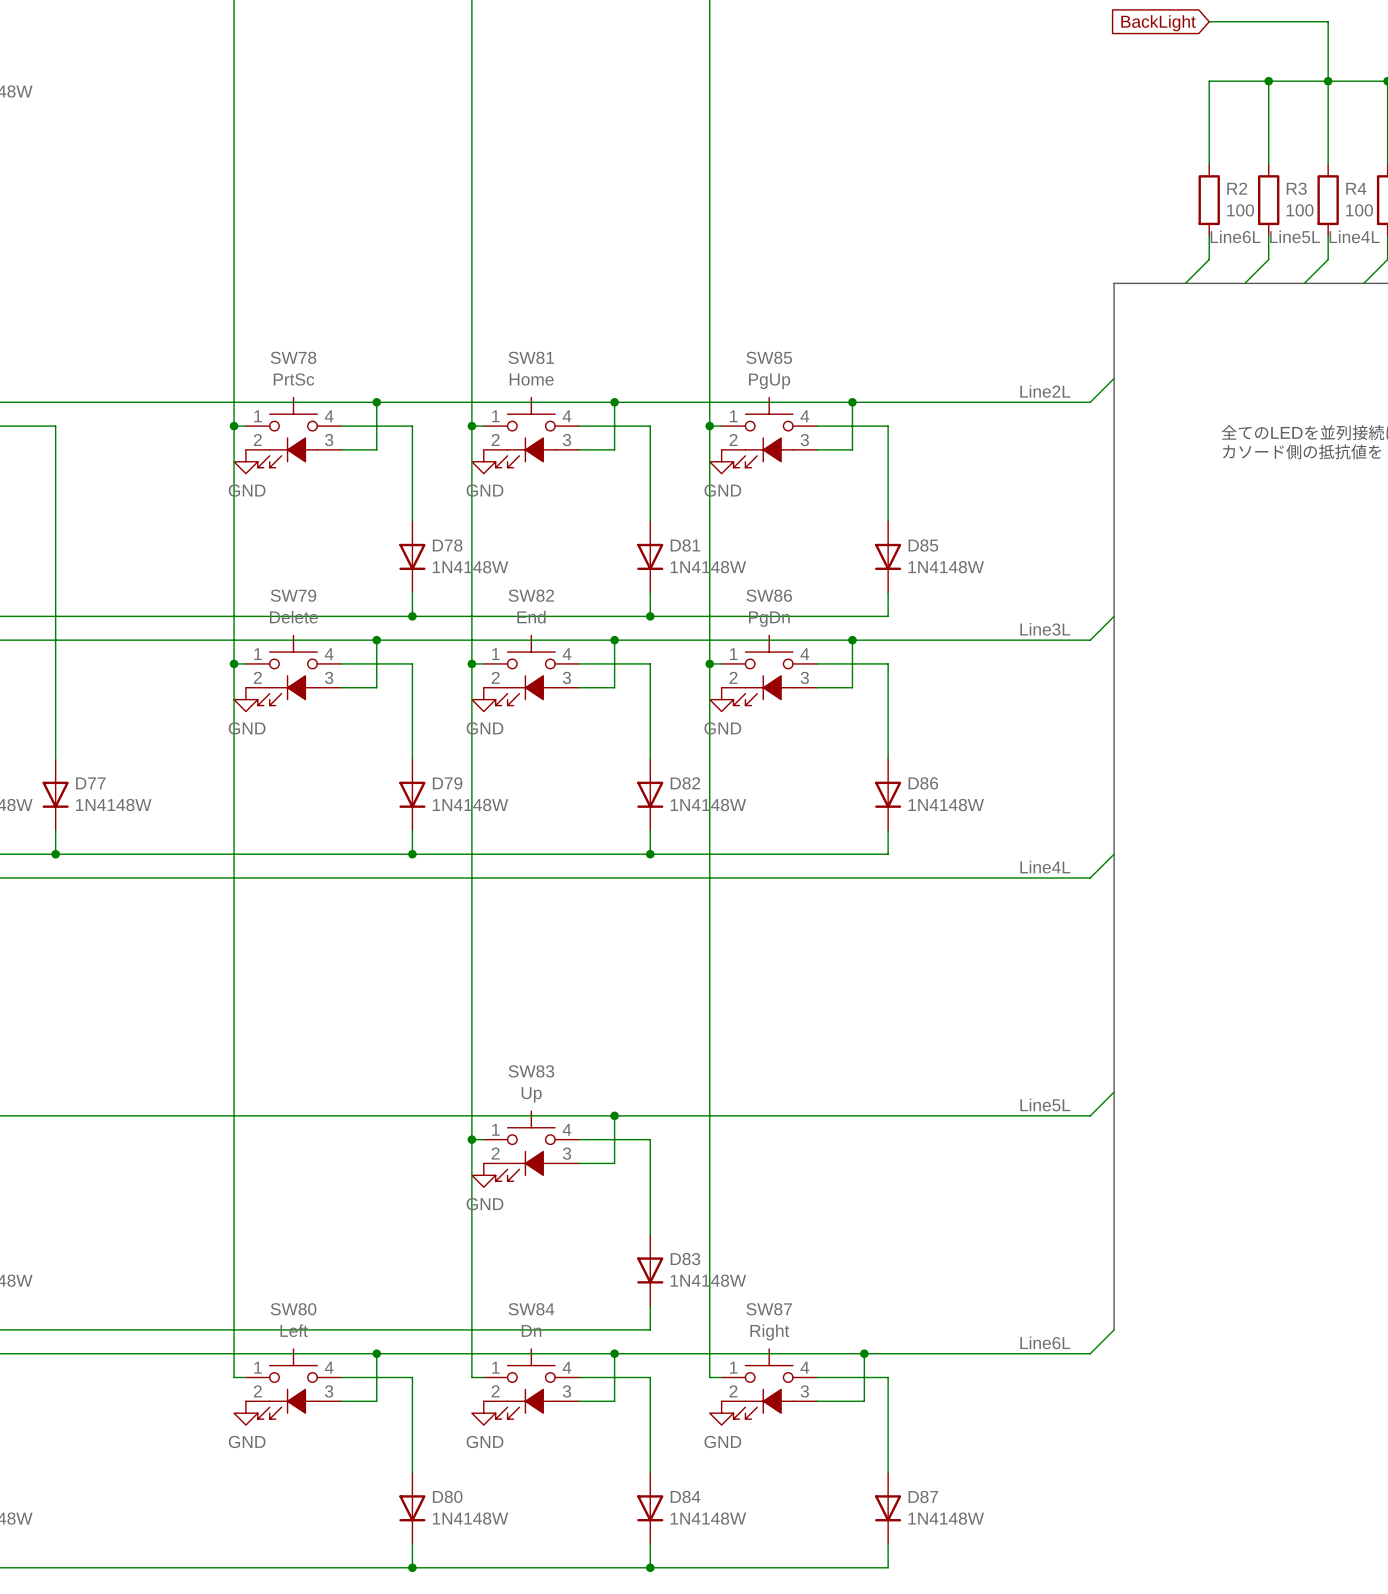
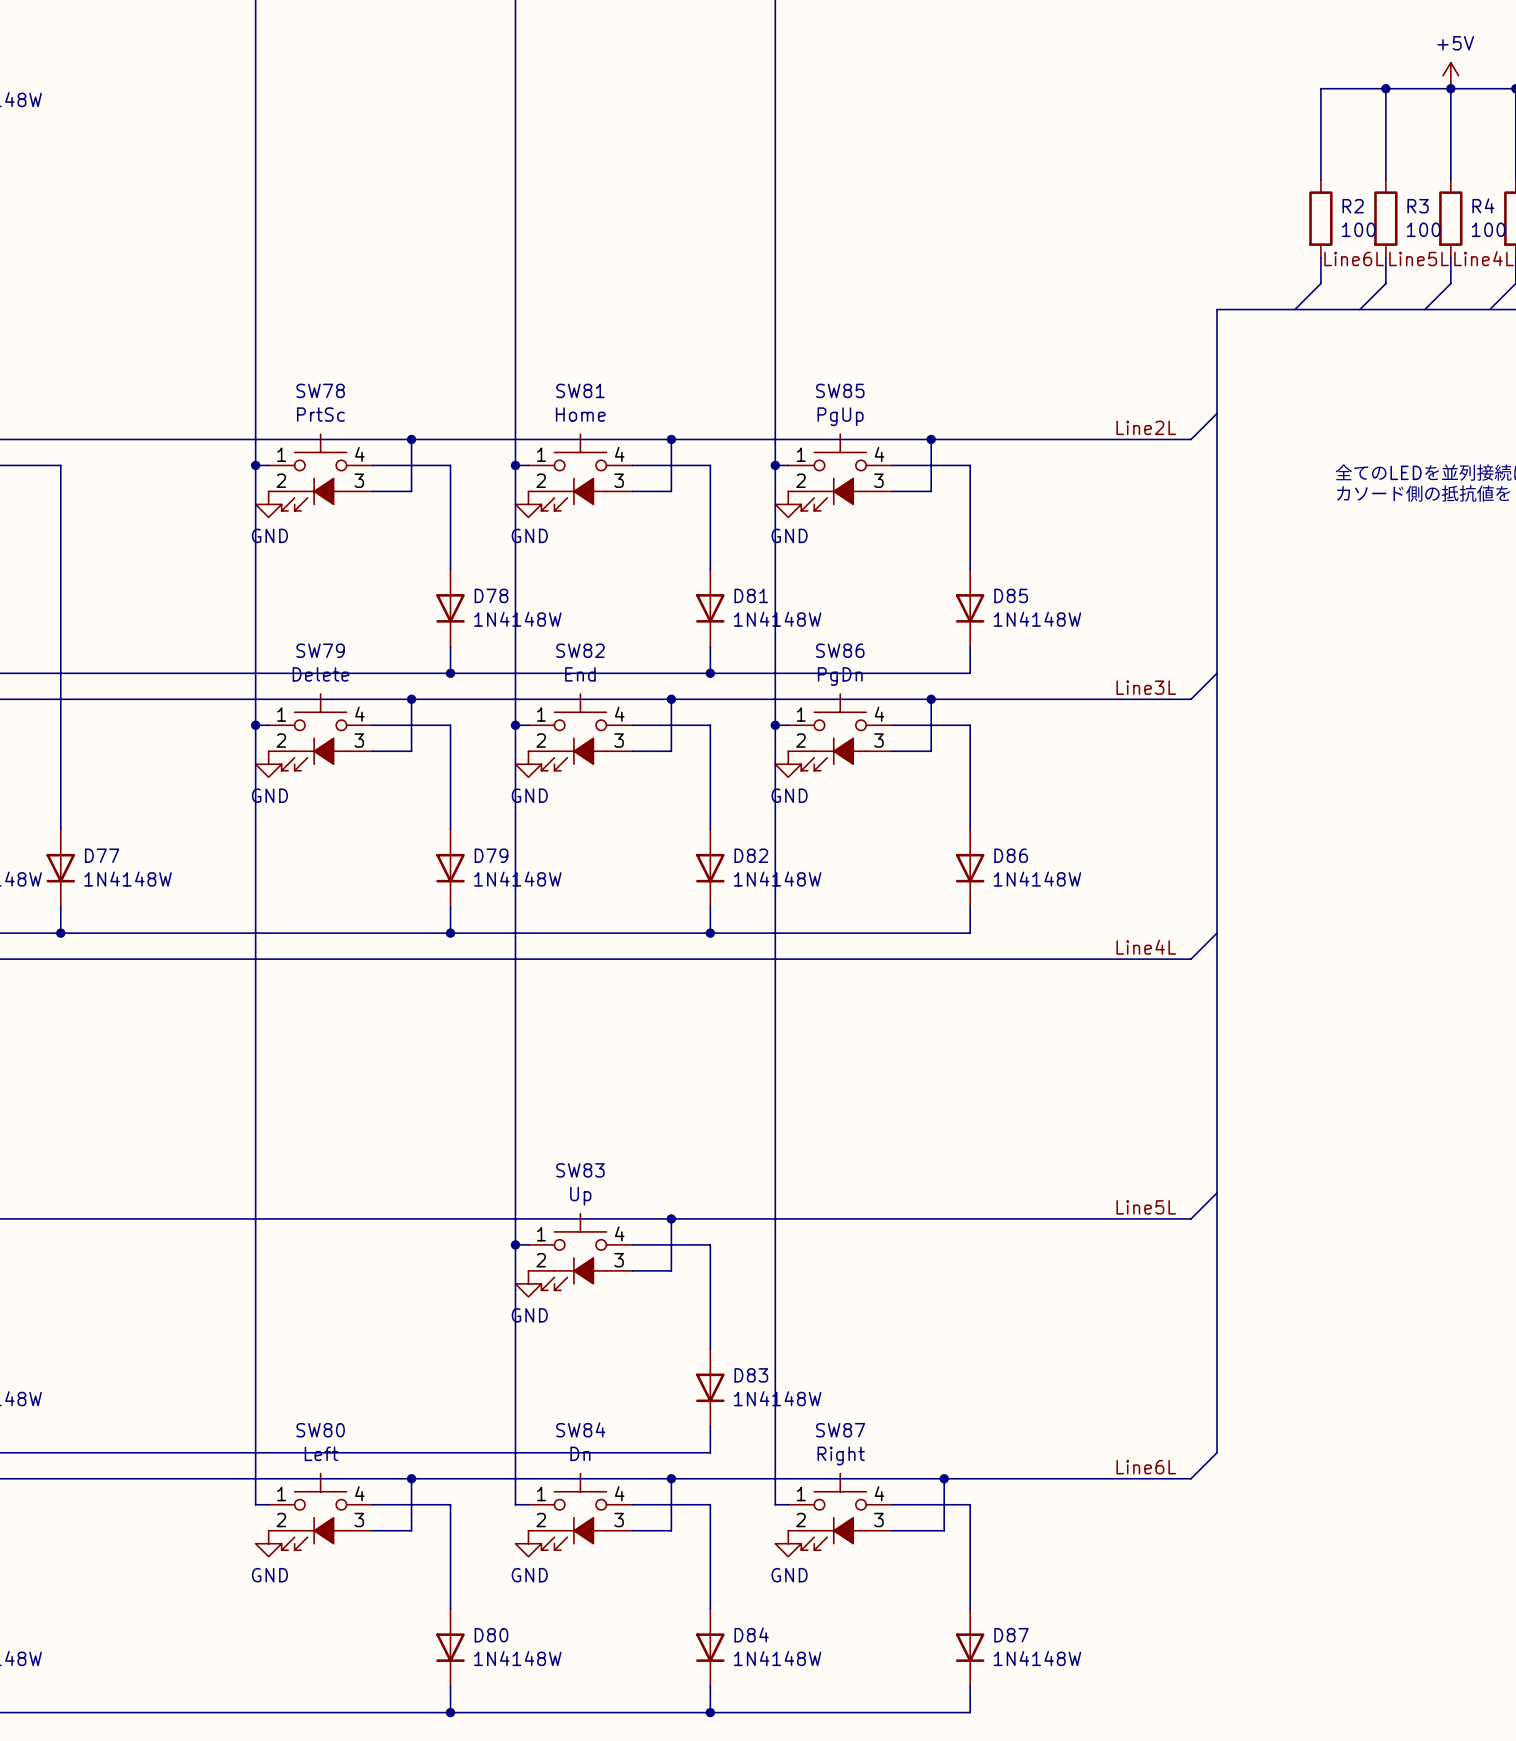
wire: (1209, 21) (1328, 21) (1328, 81) -> none
global label: BackLight (1158, 23) -> none
power symbol: none -> +5V (1450, 75)

